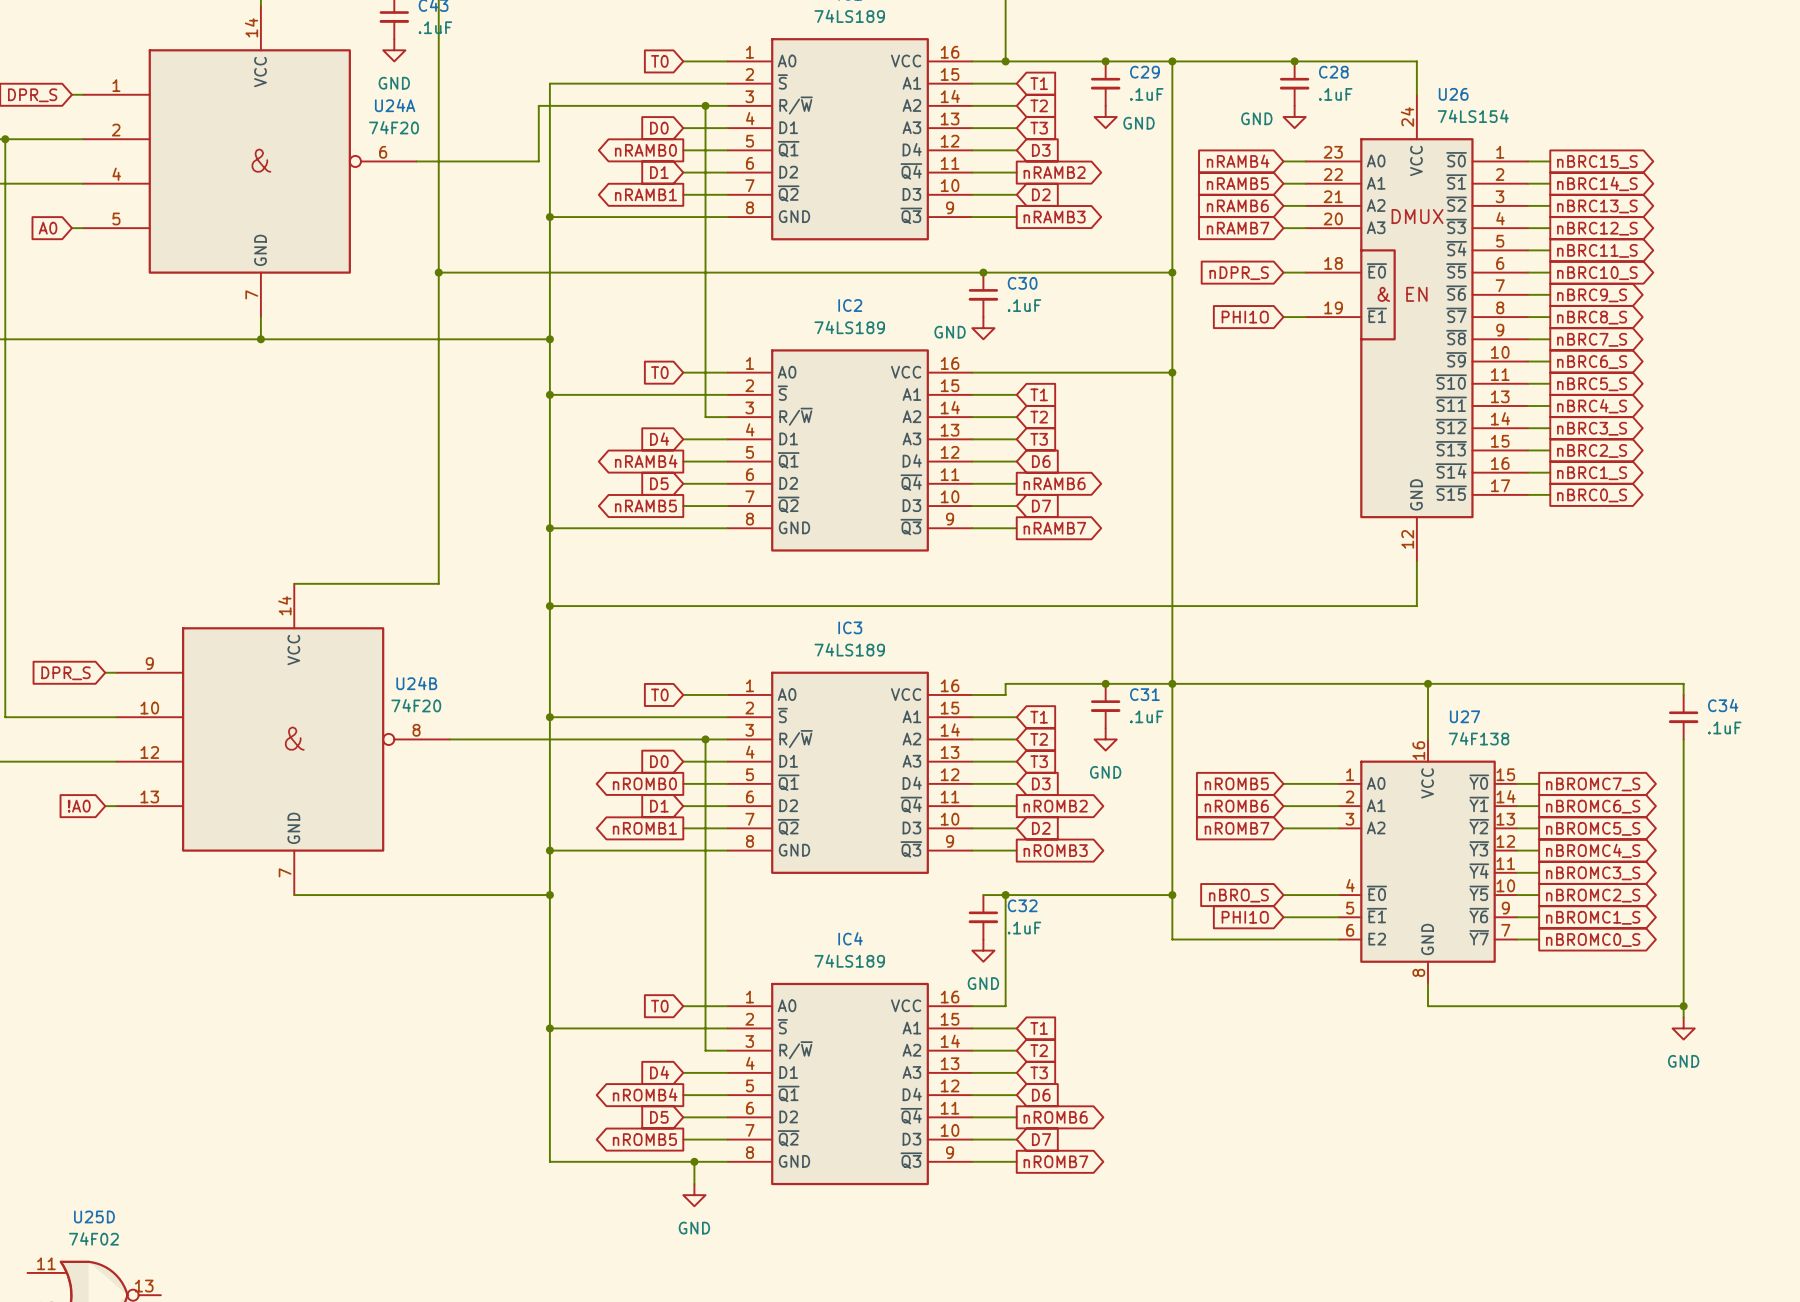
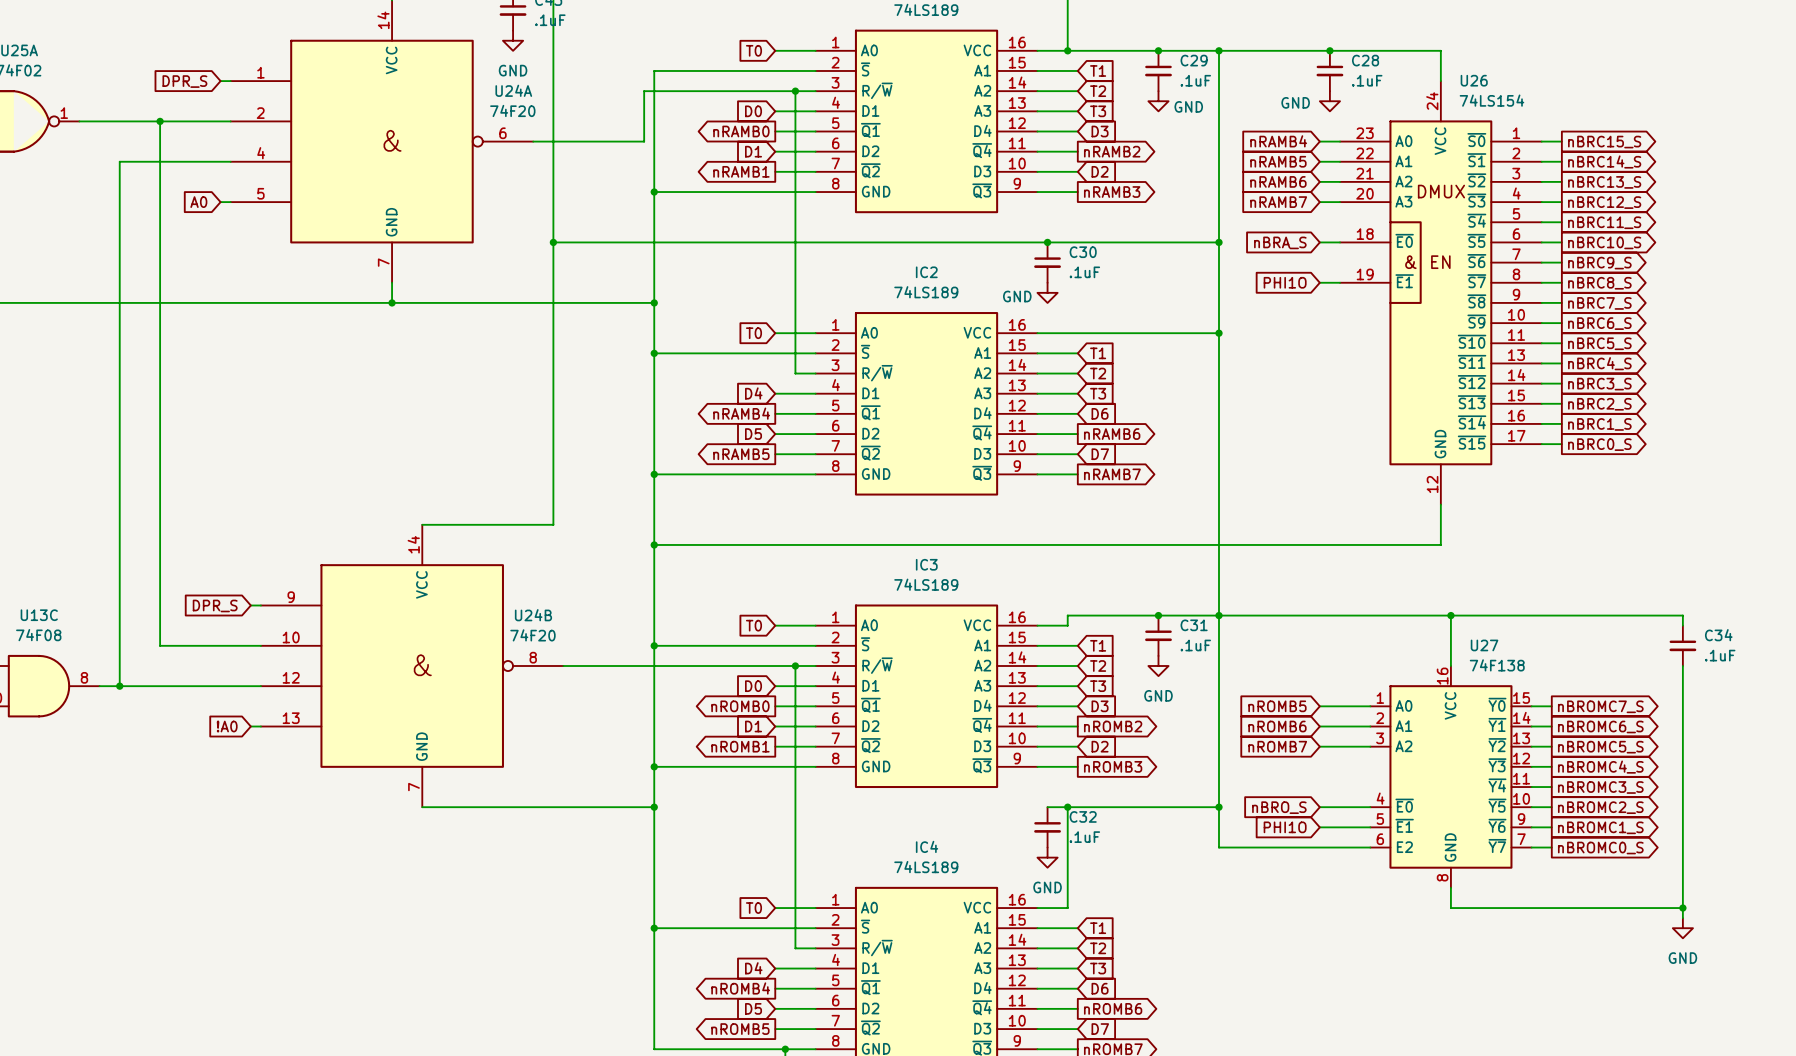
global label: nDPR_S (1239, 273) -> nBRA_S (1280, 242)

